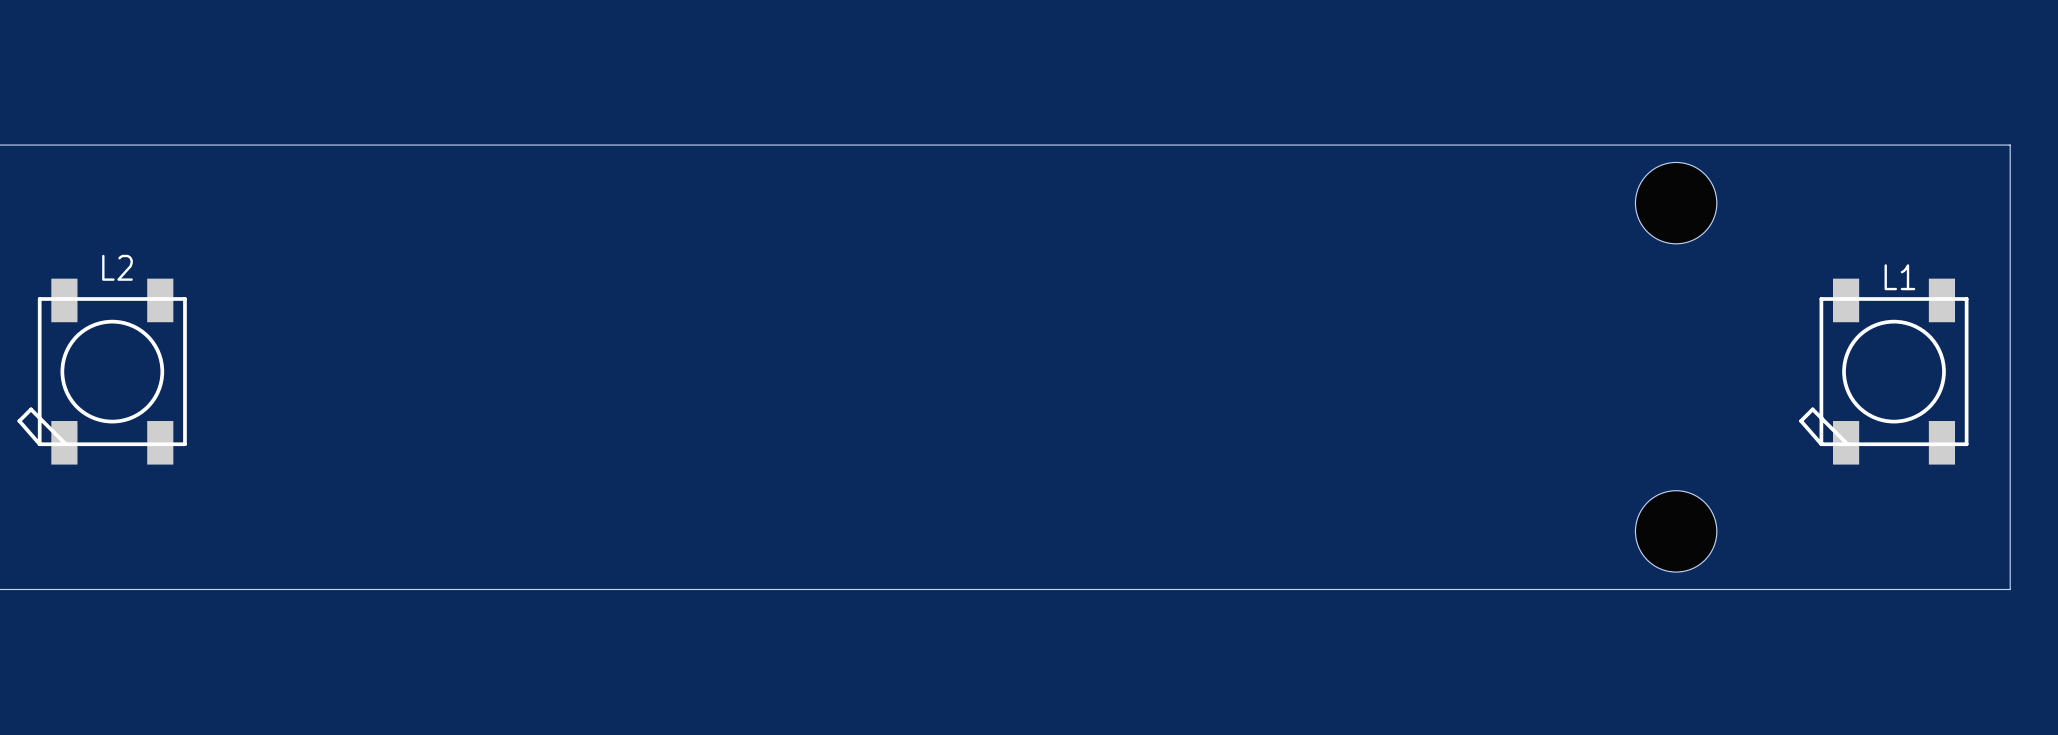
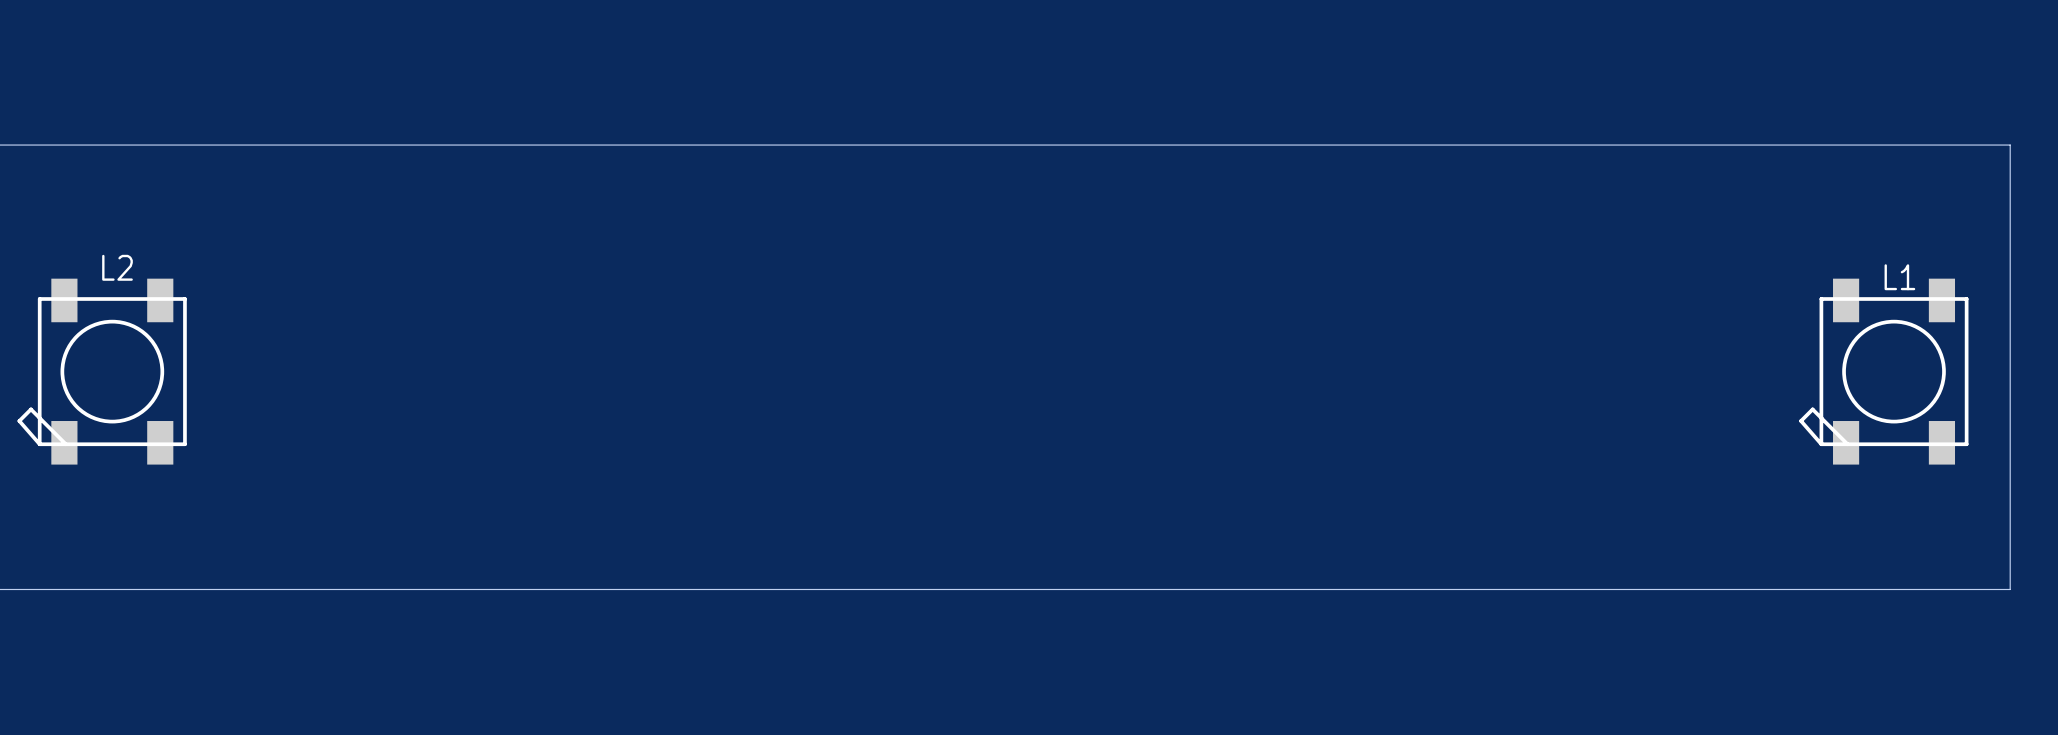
hole: (1676, 203) -> none
hole: (1676, 531) -> none

